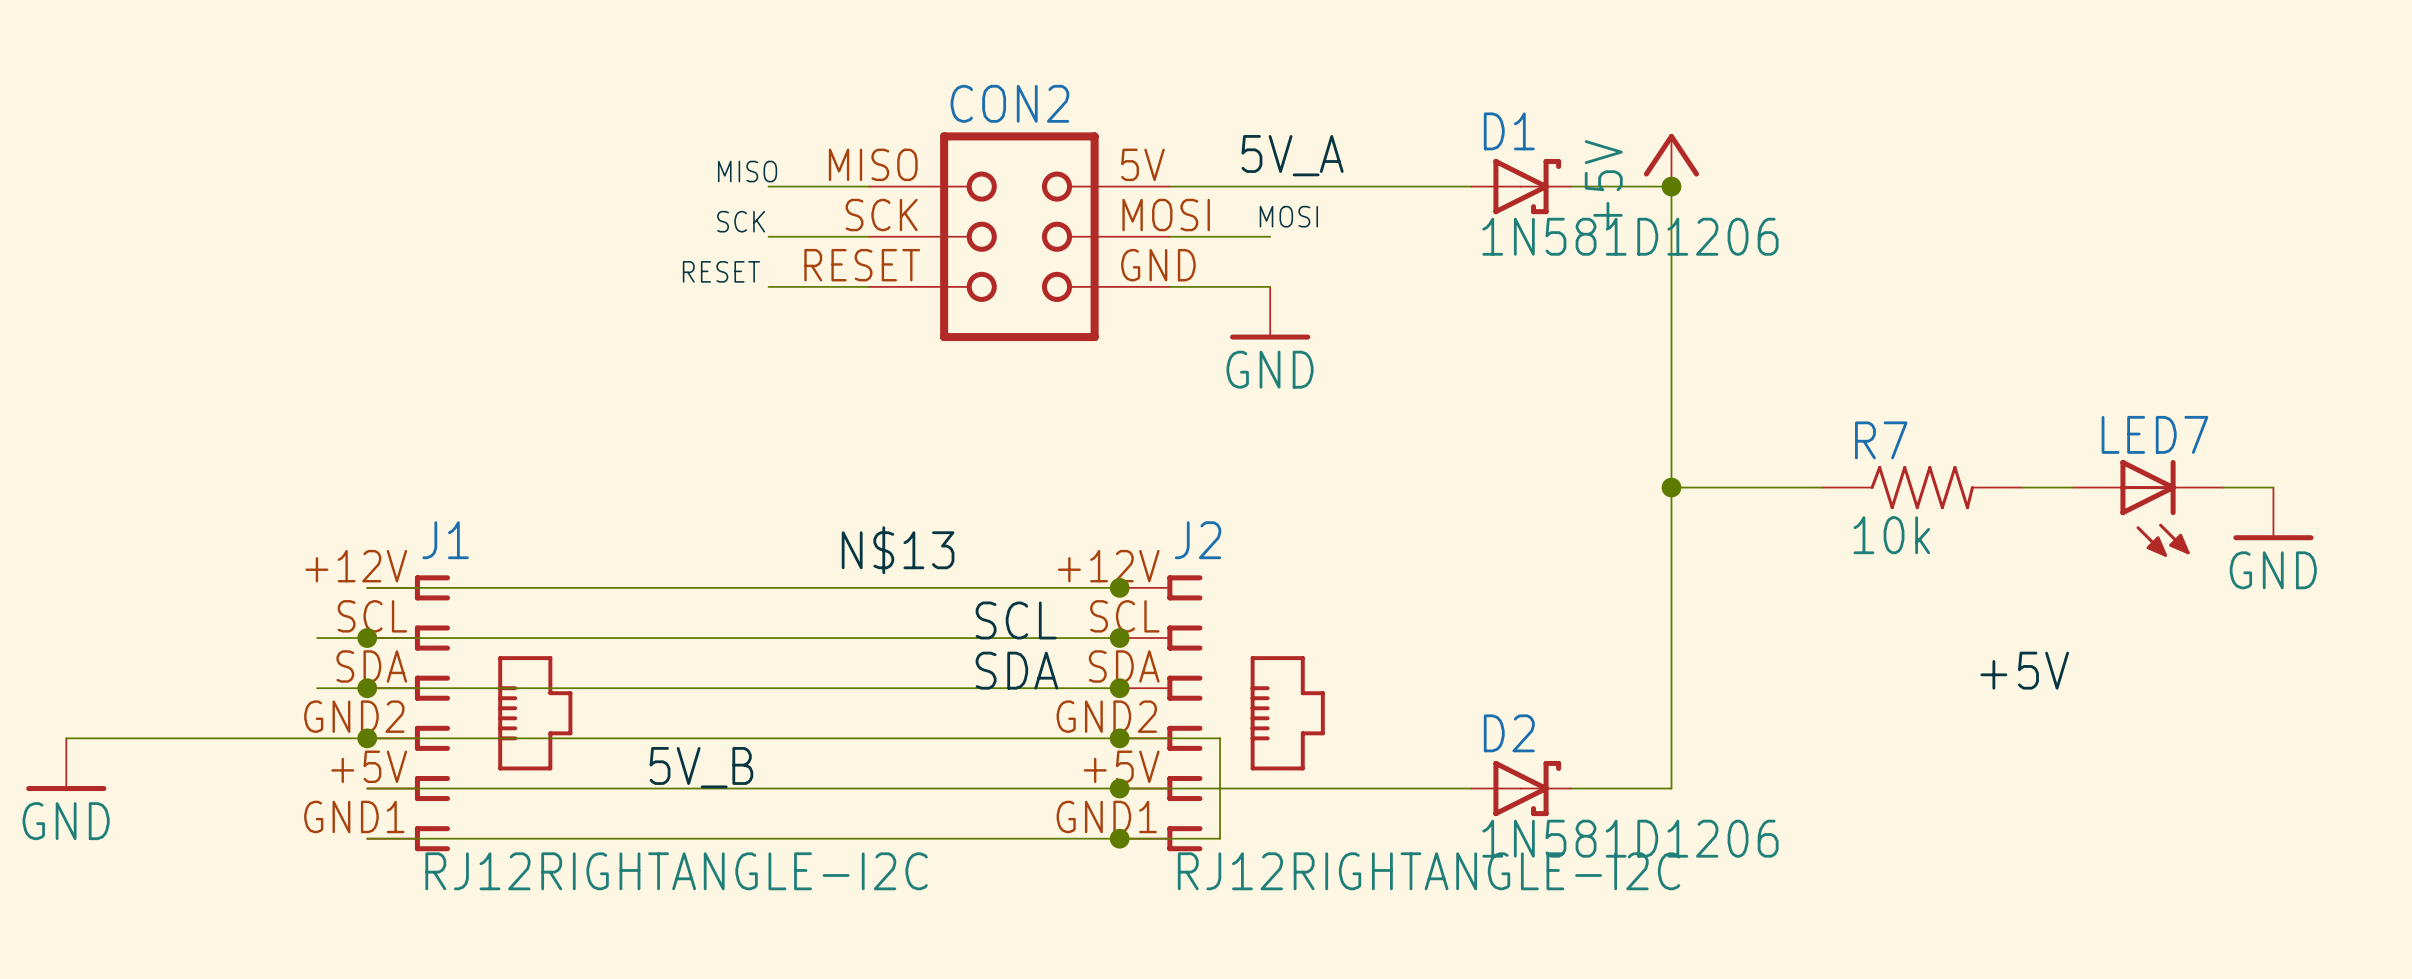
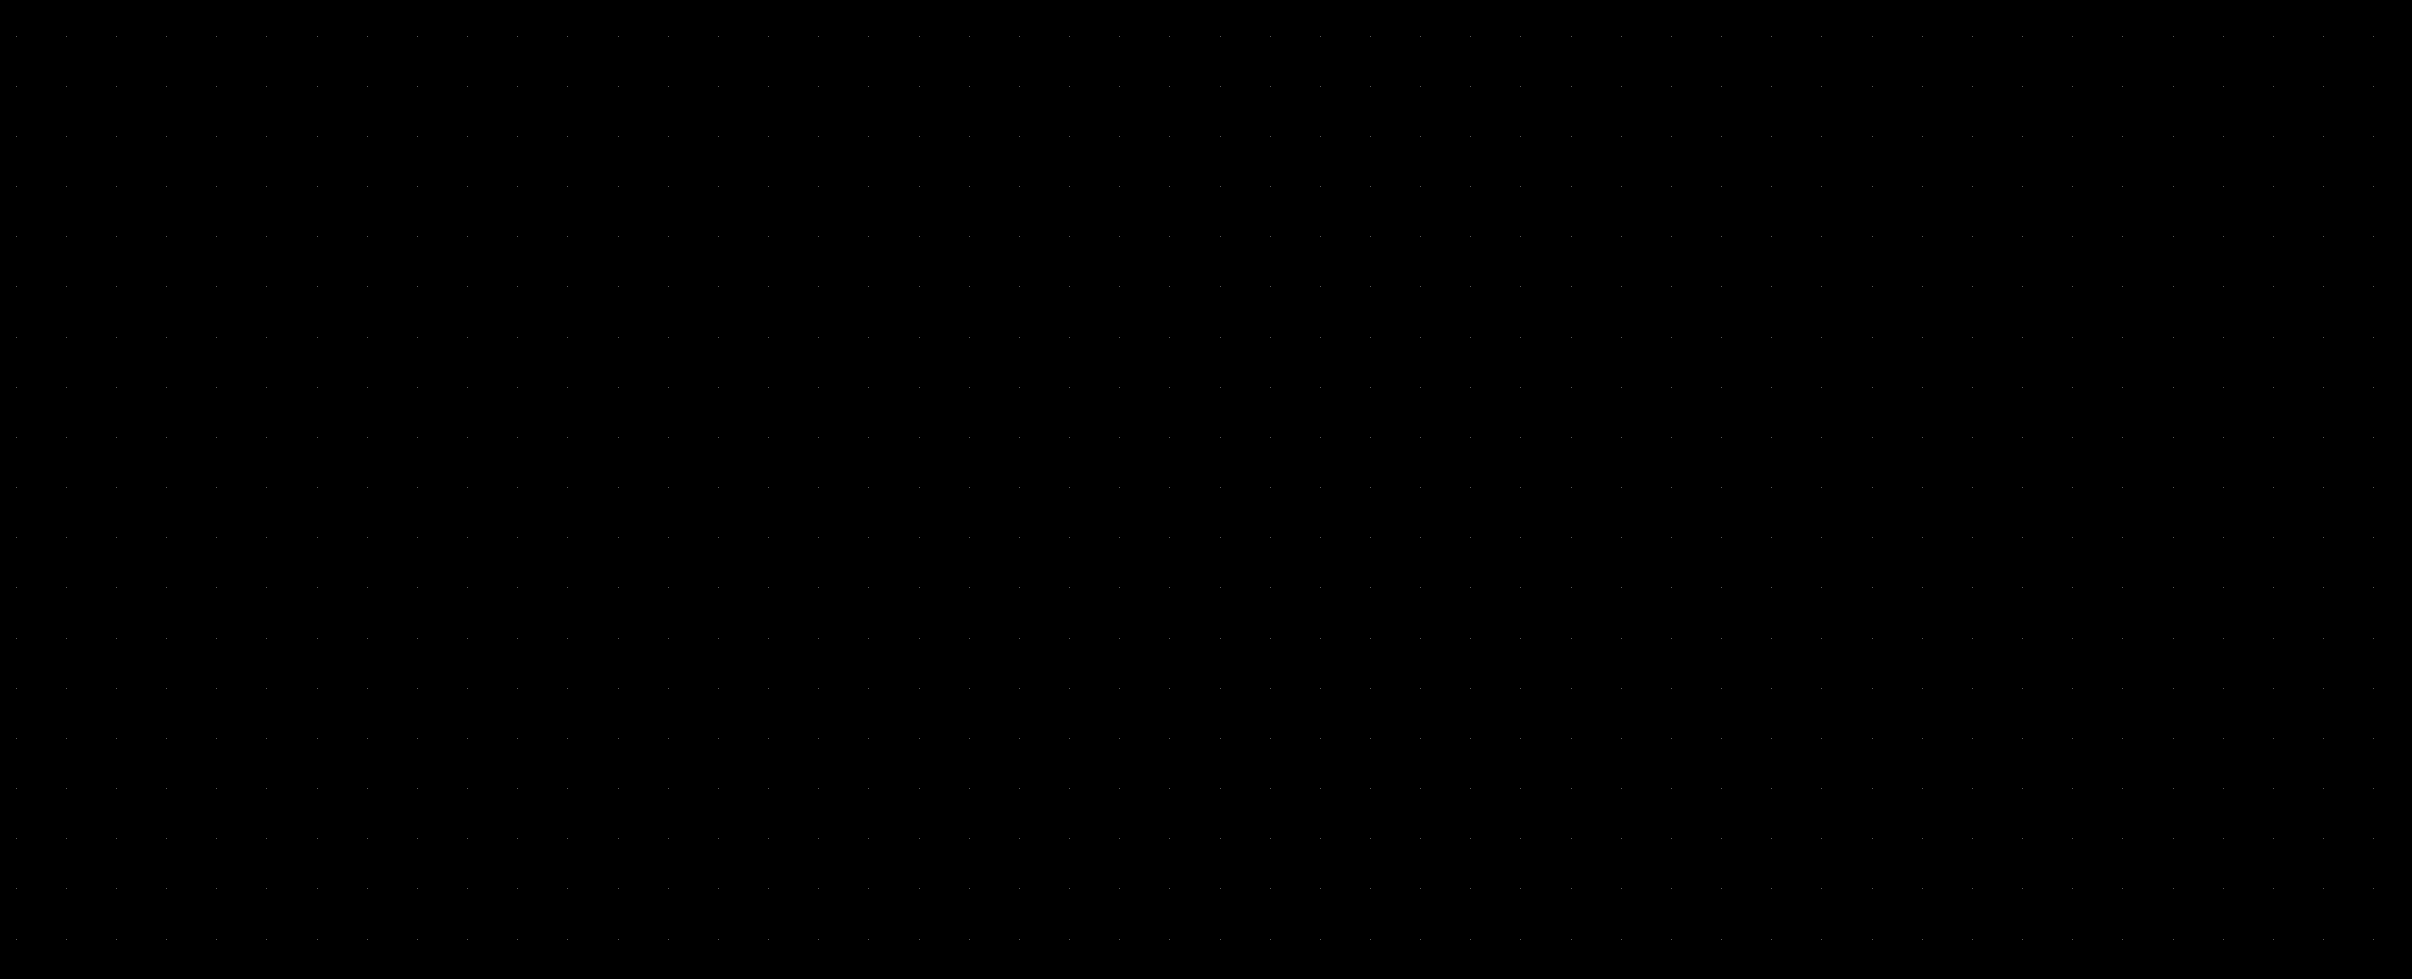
label: 5V_A (1292, 155) -> none
power symbol: +5V (1671, 160) -> none
label: MISO (747, 171) -> none
wire: (768, 186) (868, 186) -> none
wire: (1169, 186) (1470, 186) -> none
D1: 1N581D1206 (1520, 186) -> none
wire: (1571, 186) (1671, 186) (1671, 788) (1571, 788) -> none
junction: (1671, 186) -> none
label: MOSI (1288, 216) -> none
label: SCK (741, 221) -> none
wire: (768, 236) (868, 236) -> none
CON2: (1019, 236) -> none
wire: (1169, 236) (1270, 236) -> none
label: RESET (721, 271) -> none
wire: (768, 286) (868, 286) -> none
wire: (1169, 286) (1270, 286) -> none
power symbol: GND (1270, 313) -> none
wire: (1671, 487) (1821, 487) -> none
junction: (1671, 487) -> none
R7: 10k (1922, 487) -> none
wire: (2022, 487) (2072, 487) -> none
wire: (2223, 487) (2273, 487) -> none
LED7: (2148, 508) -> none
power symbol: GND (2273, 513) -> none
label: N$13 (898, 550) -> none
wire: (367, 587) (1119, 587) -> none
junction: (1119, 587) -> none
label: SCL (1016, 620) -> none
wire: (317, 638) (1119, 638) -> none
junction: (367, 638) -> none
junction: (1119, 638) -> none
label: SDA (1016, 670) -> none
label: +5V (2024, 670) -> none
wire: (317, 688) (1119, 688) -> none
junction: (367, 688) -> none
junction: (1119, 688) -> none
J1: RJ12RIGHTANGLE-I2C (469, 713) -> none
J2: RJ12RIGHTANGLE-I2C (1222, 713) -> none
wire: (66, 738) (1220, 738) (1220, 838) (367, 838) -> none
junction: (367, 738) -> none
junction: (1119, 738) -> none
power symbol: GND (66, 764) -> none
label: 5V_B (701, 767) -> none
wire: (367, 788) (1470, 788) -> none
junction: (1119, 788) -> none
D2: 1N581D1206 (1520, 788) -> none
junction: (1119, 838) -> none

